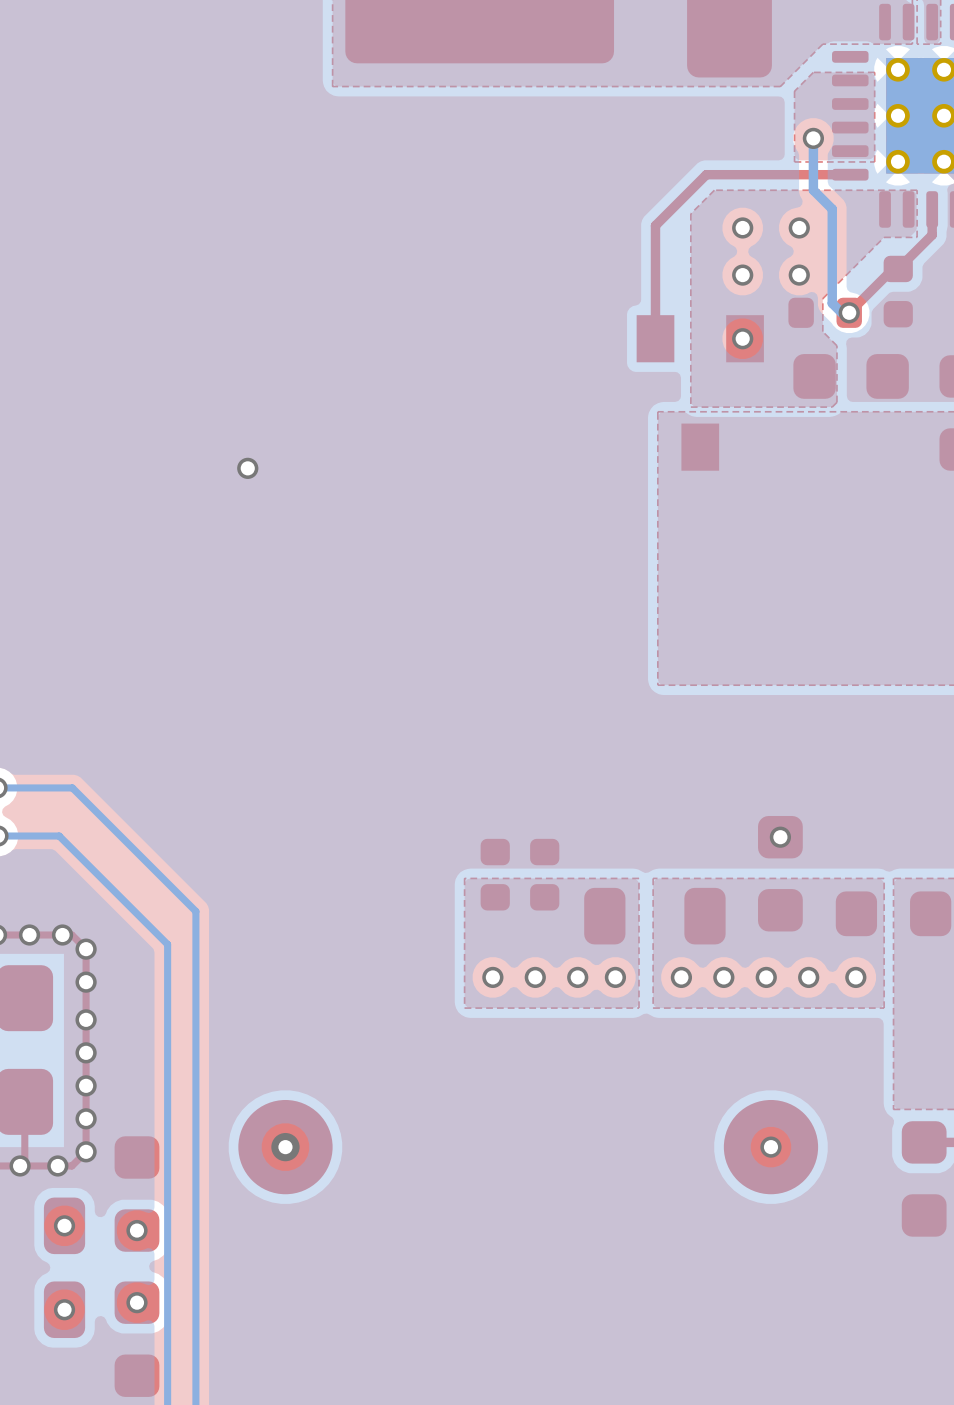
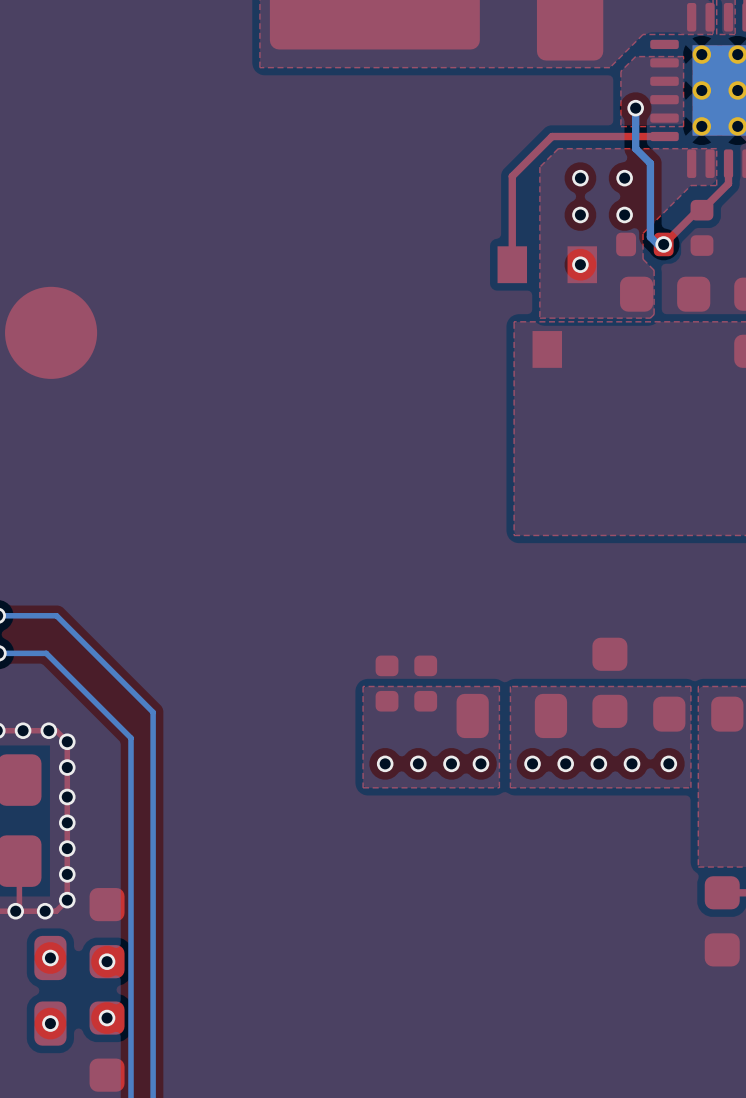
part: none -> (51, 332)
via: (247, 468) -> none
via: (780, 837) -> none
part: (285, 1147) -> none
via: (285, 1147) -> none
part: (770, 1147) -> none
via: (770, 1147) -> none

